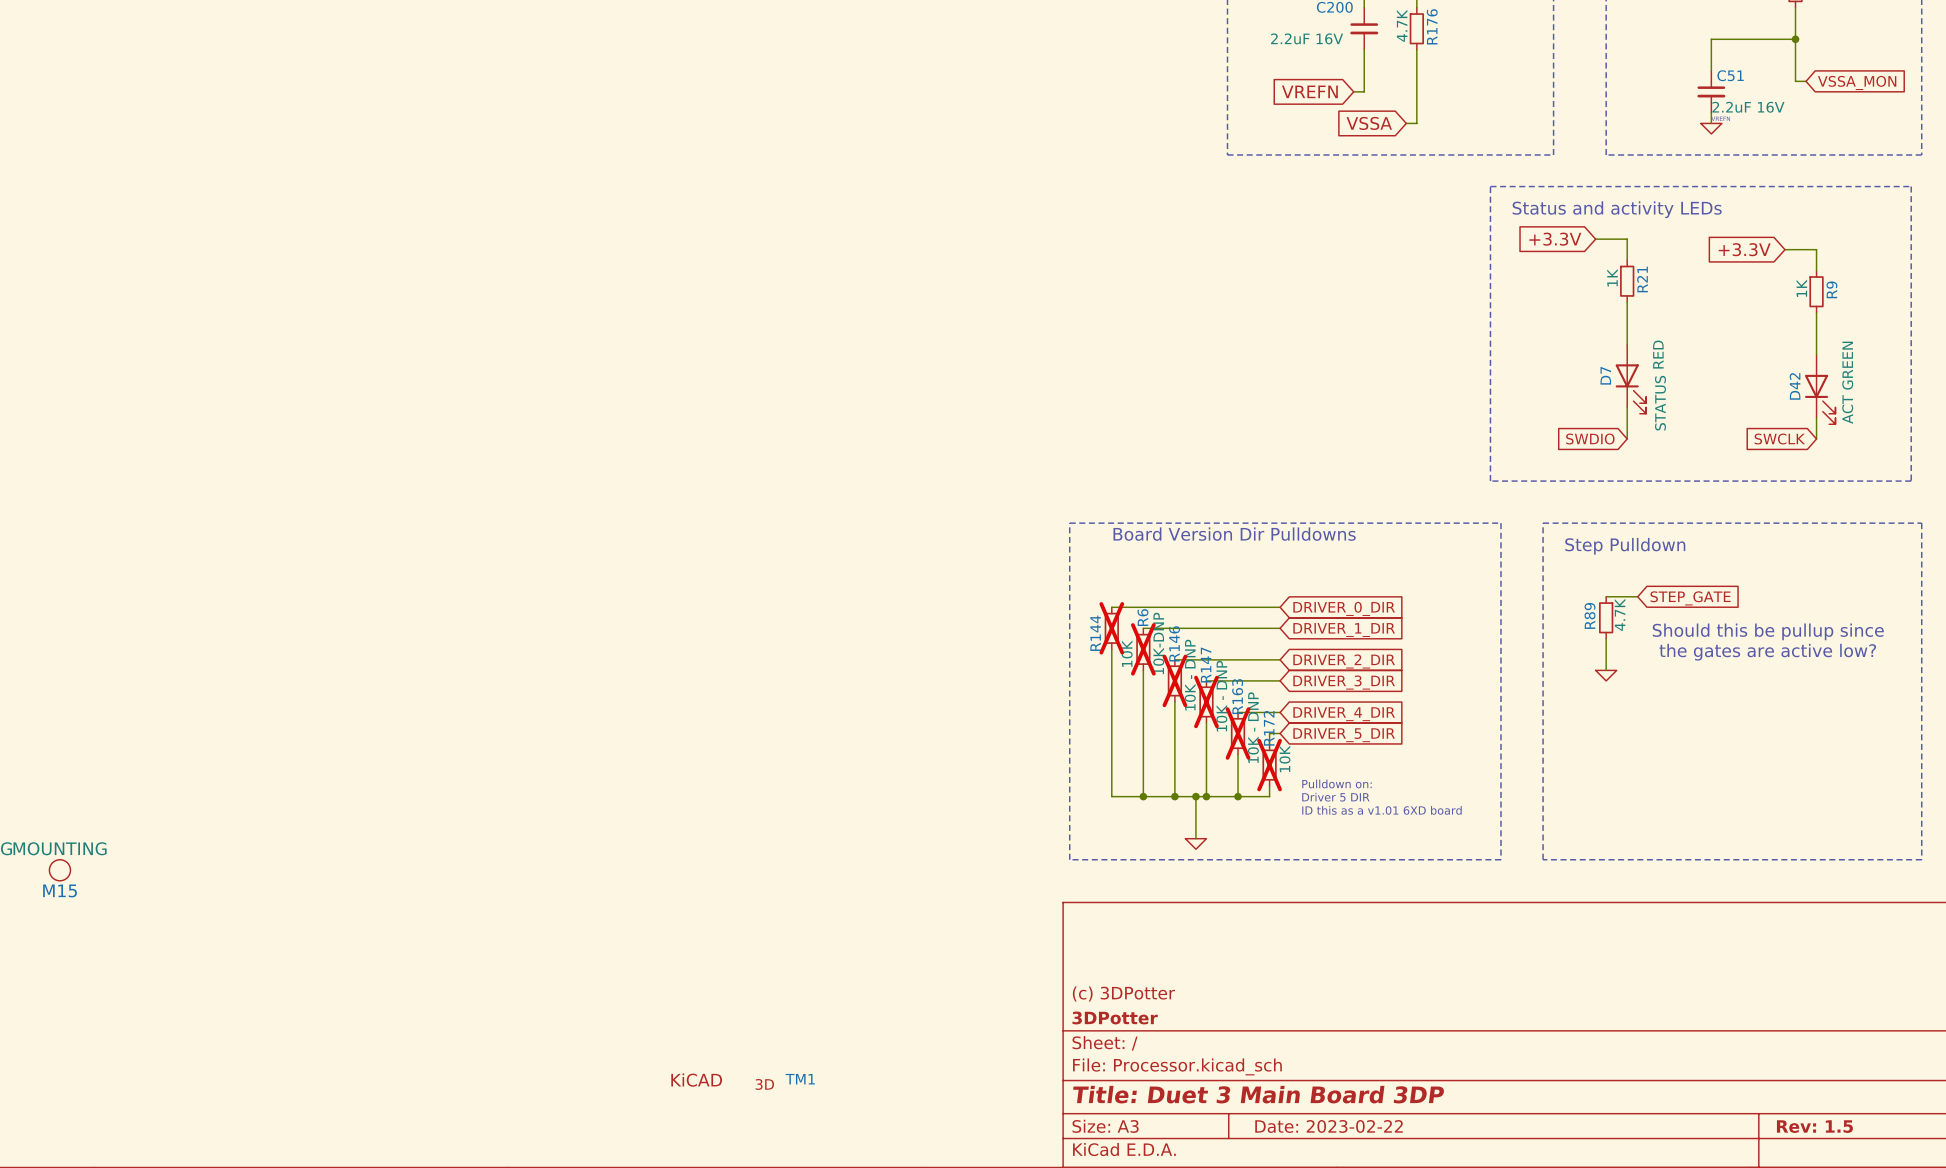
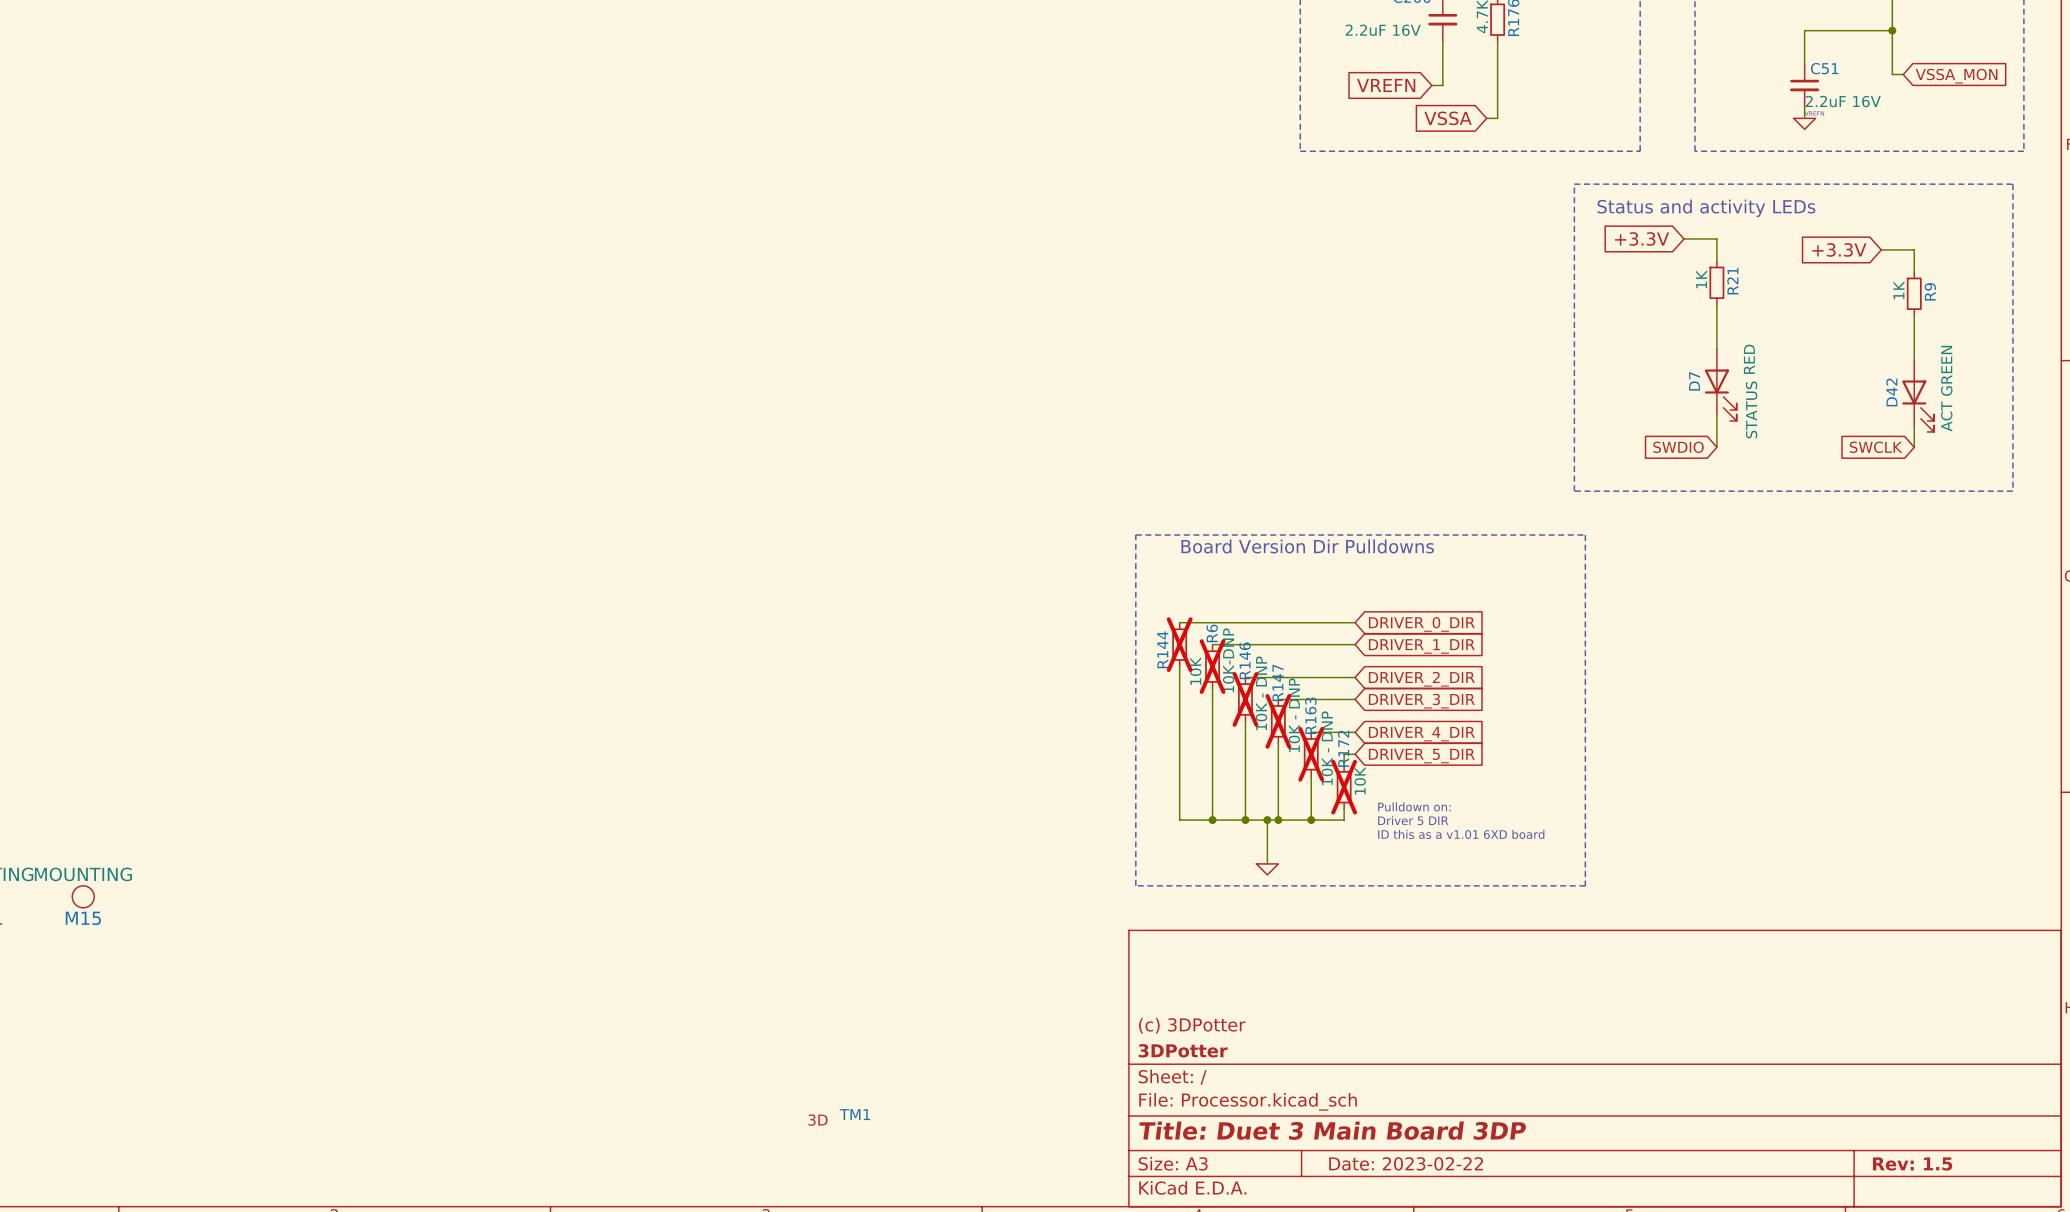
line: (1543, 523) (1921, 523) (1921, 859) (1543, 859) (1543, 523) -> none
text: Step Pulldown (1625, 546) -> none
wire: (1606, 596) (1637, 596) -> none
global label: STEP_GATE (1690, 598) -> none
R89: 4.7K (1606, 617) -> none
text: Should this be pullup since (1768, 631) -> none
wire: (1606, 638) (1606, 670) -> none
text: the gates are active low? (1767, 652) -> none
power symbol: (1606, 675) -> none
part: (696, 1080) -> none

